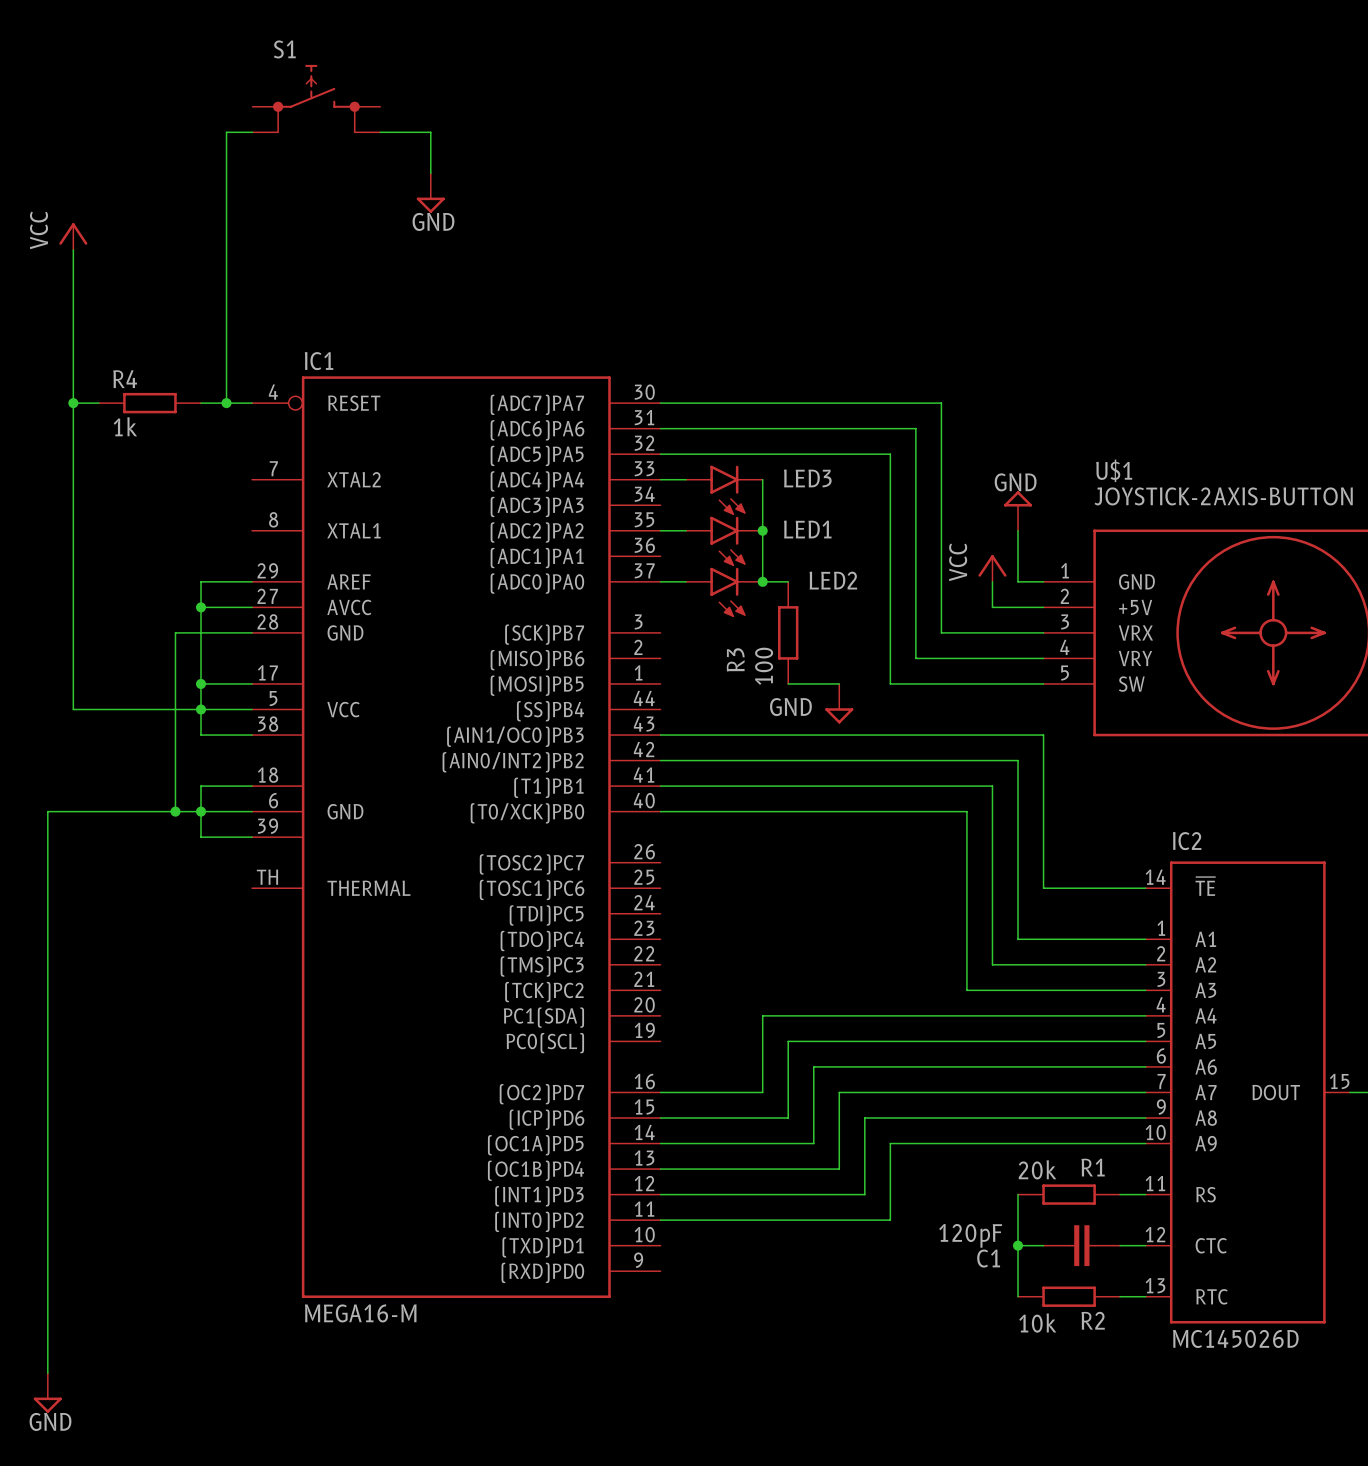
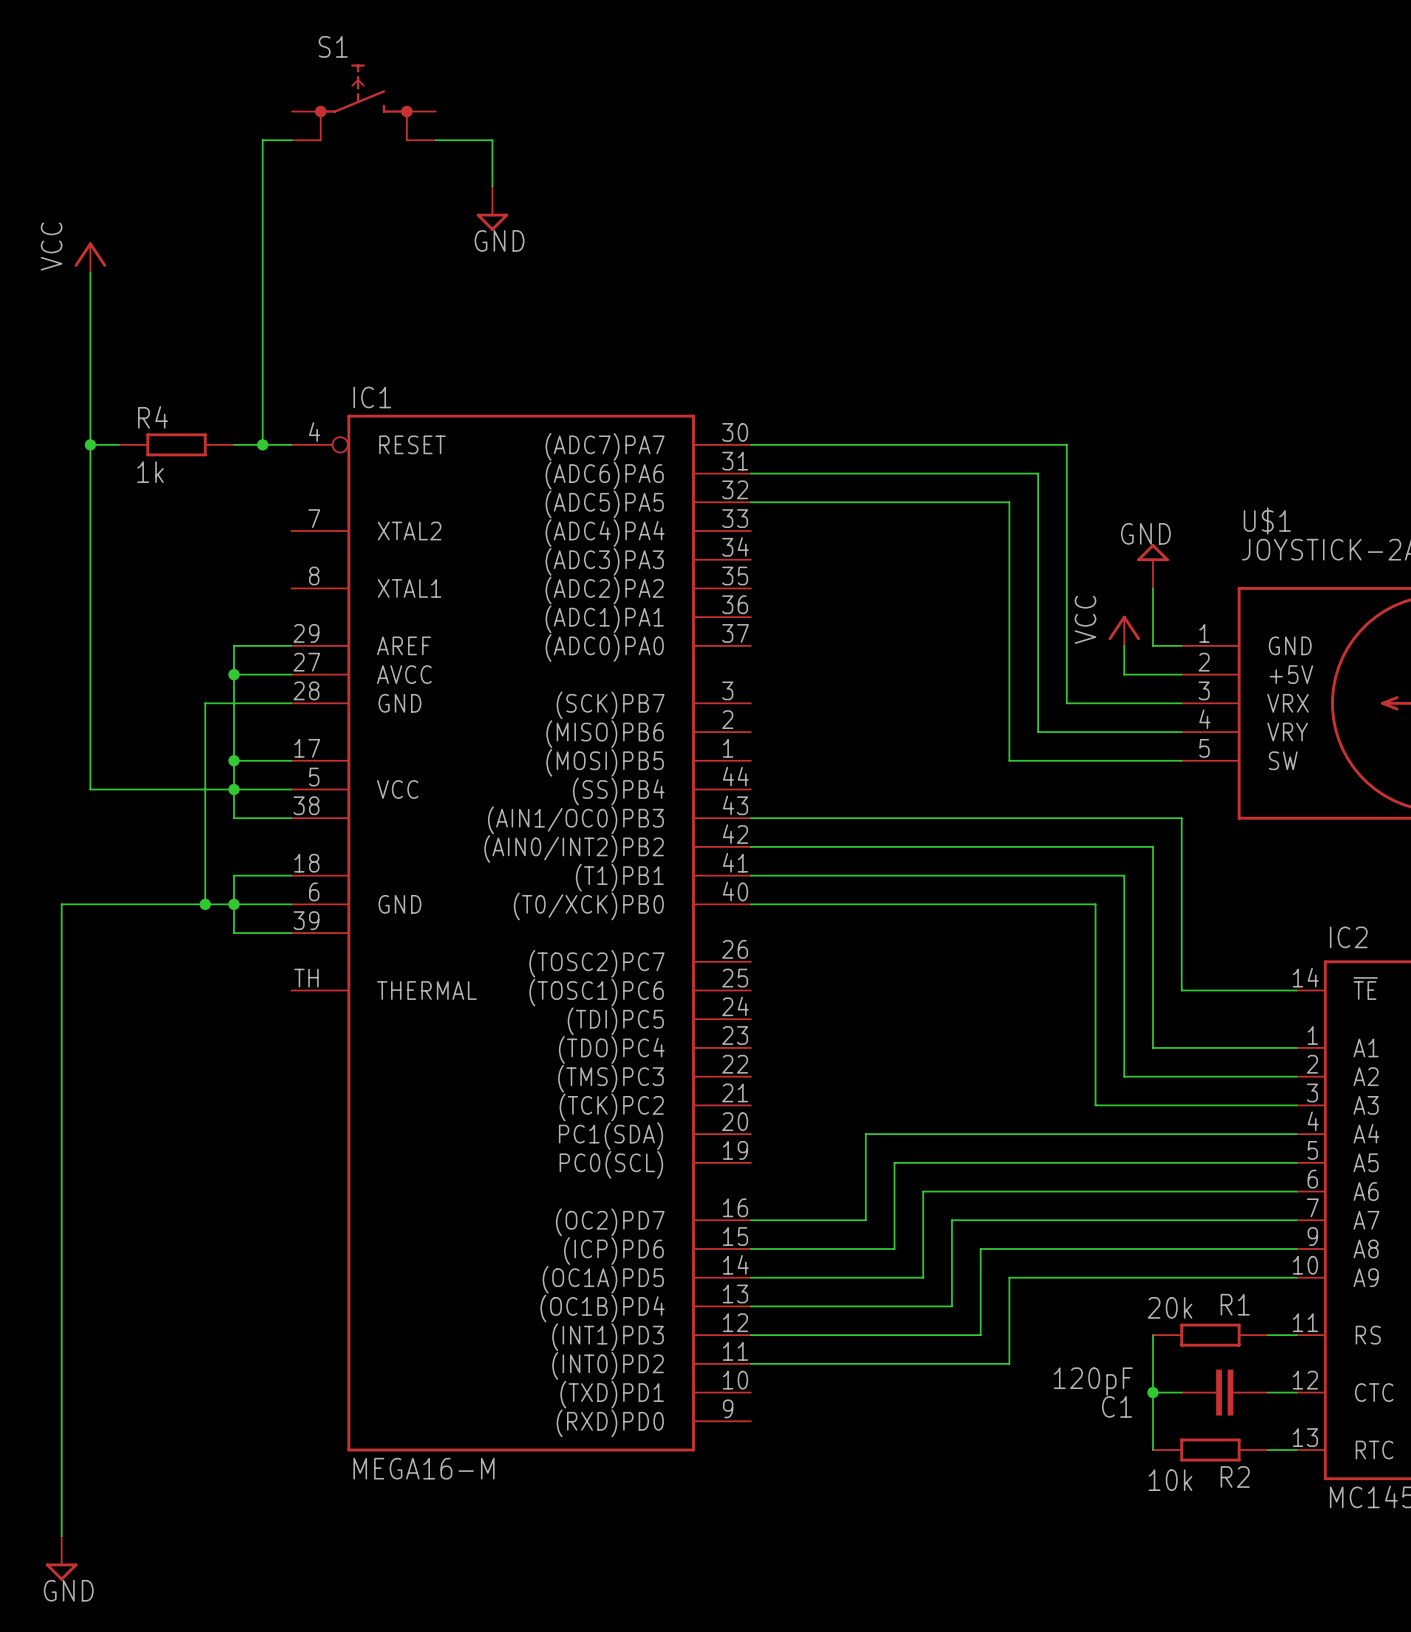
wire: (660, 479) (686, 479) -> none
wire: (762, 479) (762, 581) (788, 581) -> none
LED3: (724, 490) -> none
wire: (660, 530) (686, 530) -> none
junction: (762, 530) -> none
LED1: (724, 541) -> none
wire: (660, 581) (686, 581) -> none
junction: (762, 581) -> none
LED2: (724, 592) -> none
R3: 100 (788, 632) -> none
wire: (788, 683) (839, 683) -> none
power symbol: GND (839, 703) -> none

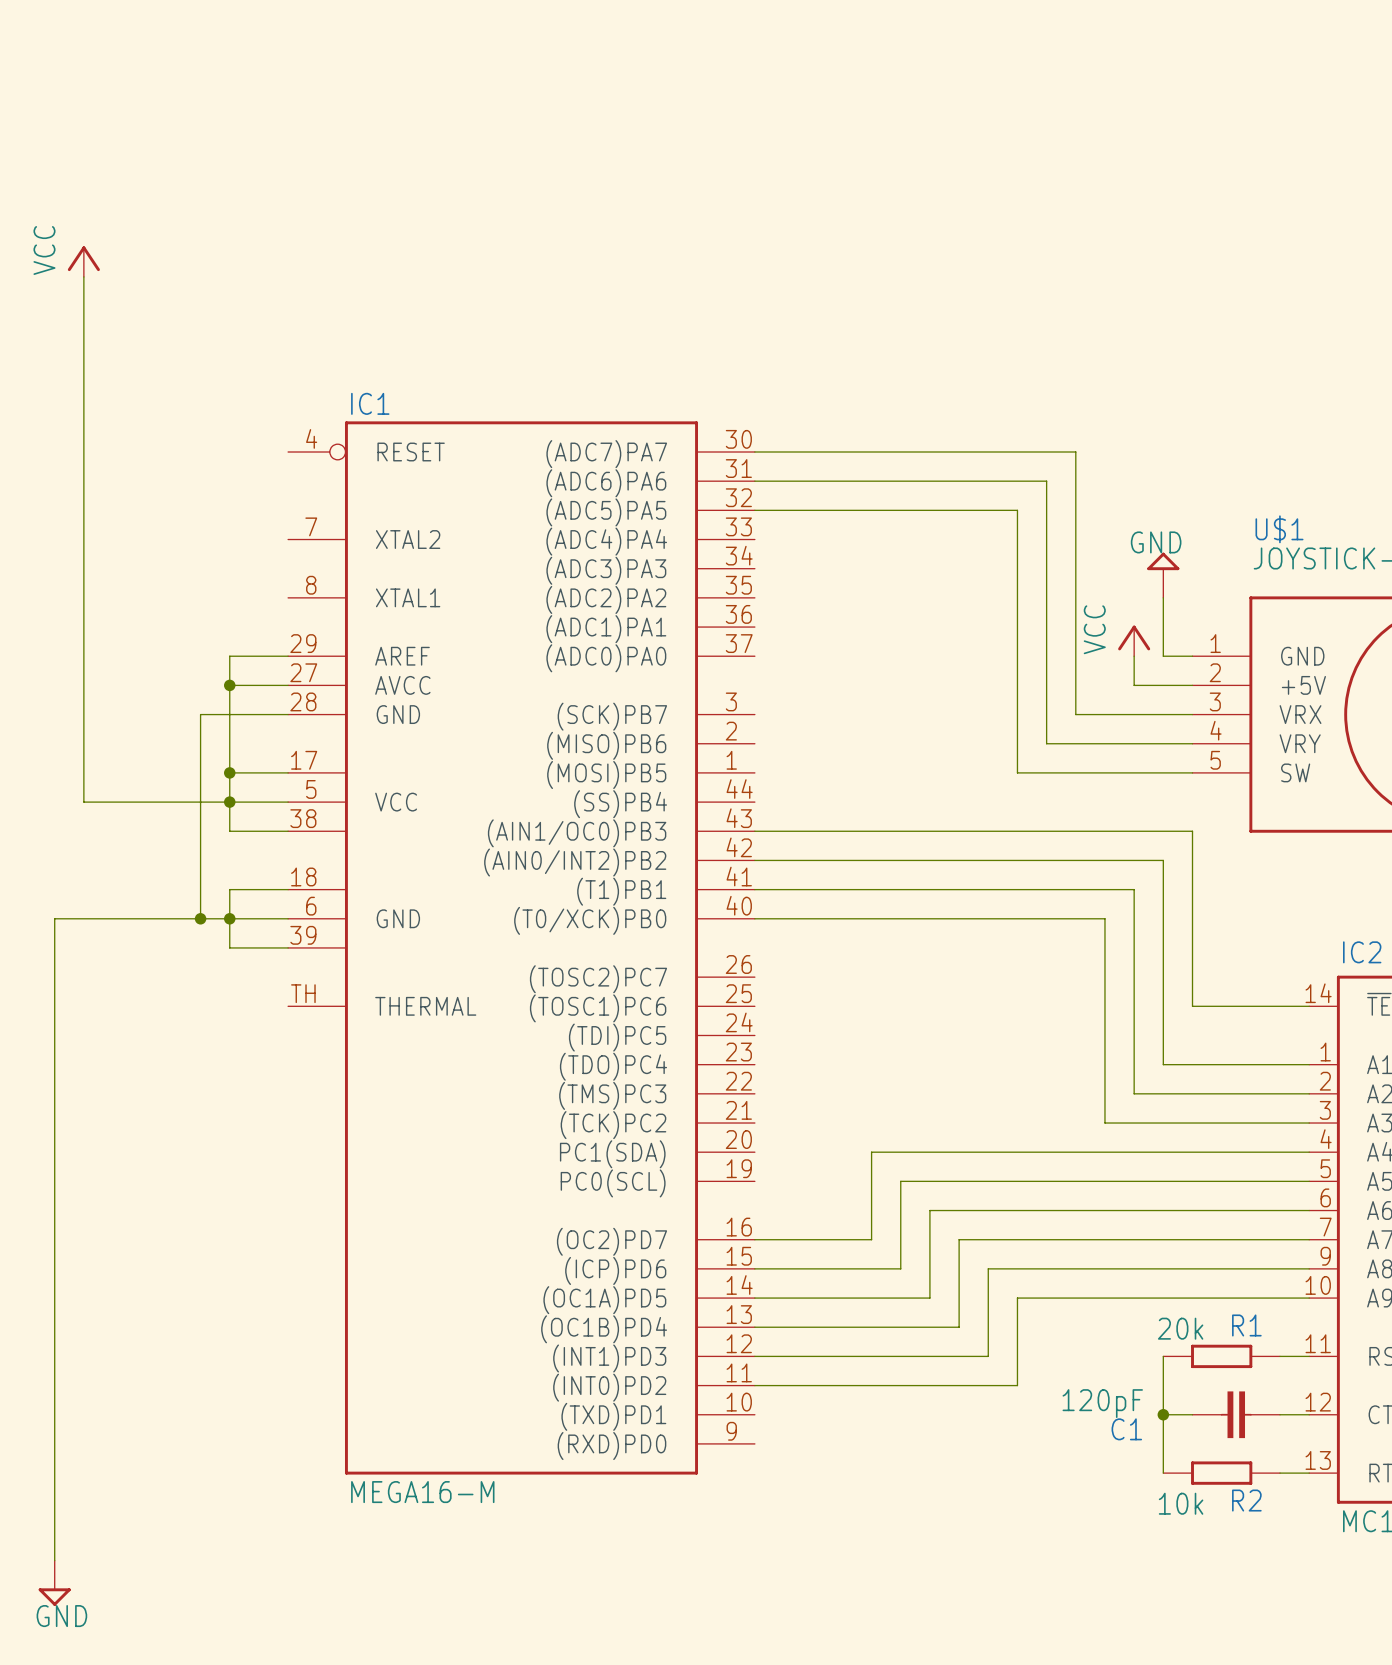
S1: (363, 102) -> none
wire: (292, 140) (262, 140) (262, 444) -> none
wire: (435, 140) (492, 140) (492, 186) -> none
power symbol: GND (492, 208) -> none
wire: (90, 444) (119, 444) -> none
junction: (90, 444) -> none
R4: 1k (176, 444) -> none
wire: (233, 444) (291, 444) -> none
junction: (262, 444) -> none

